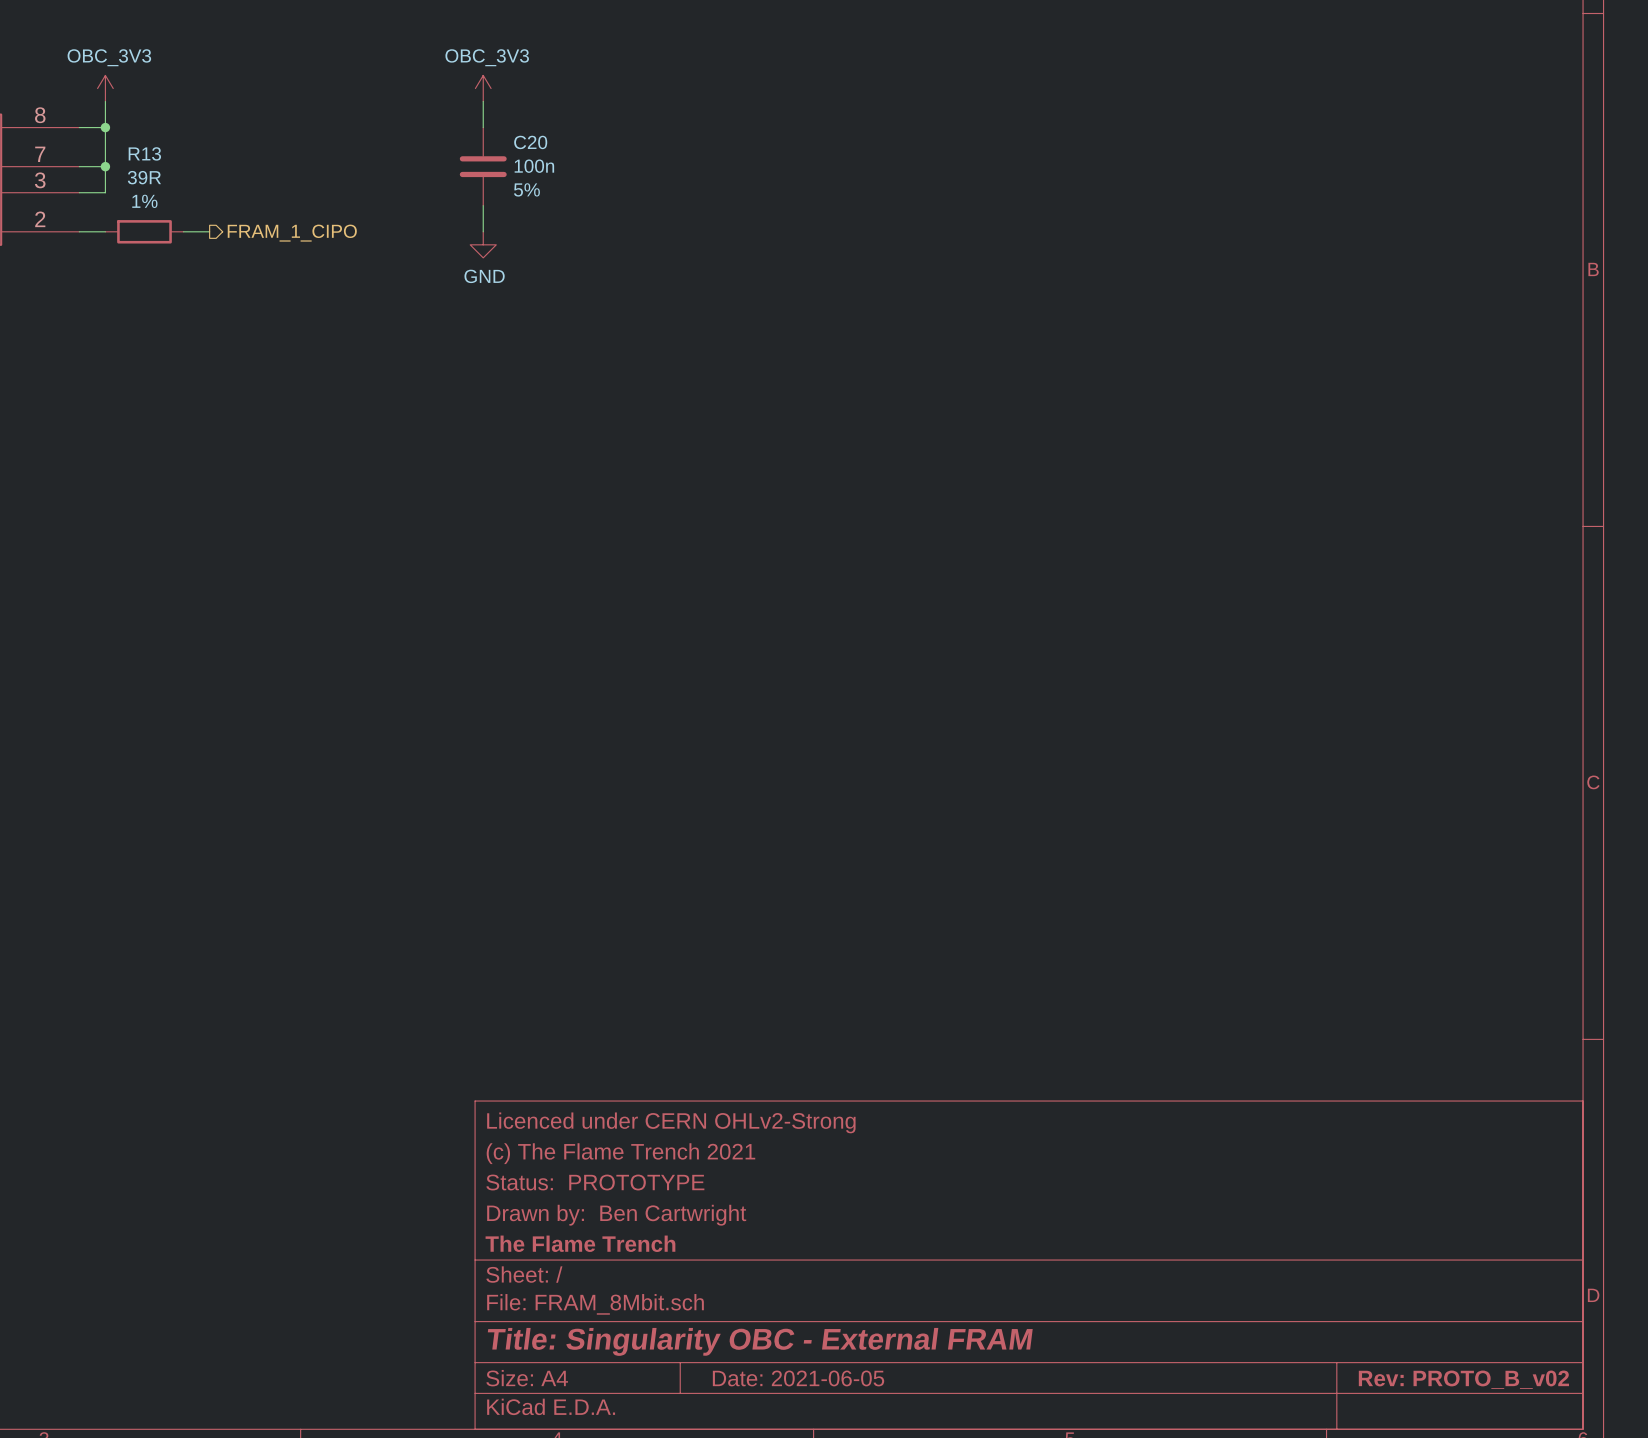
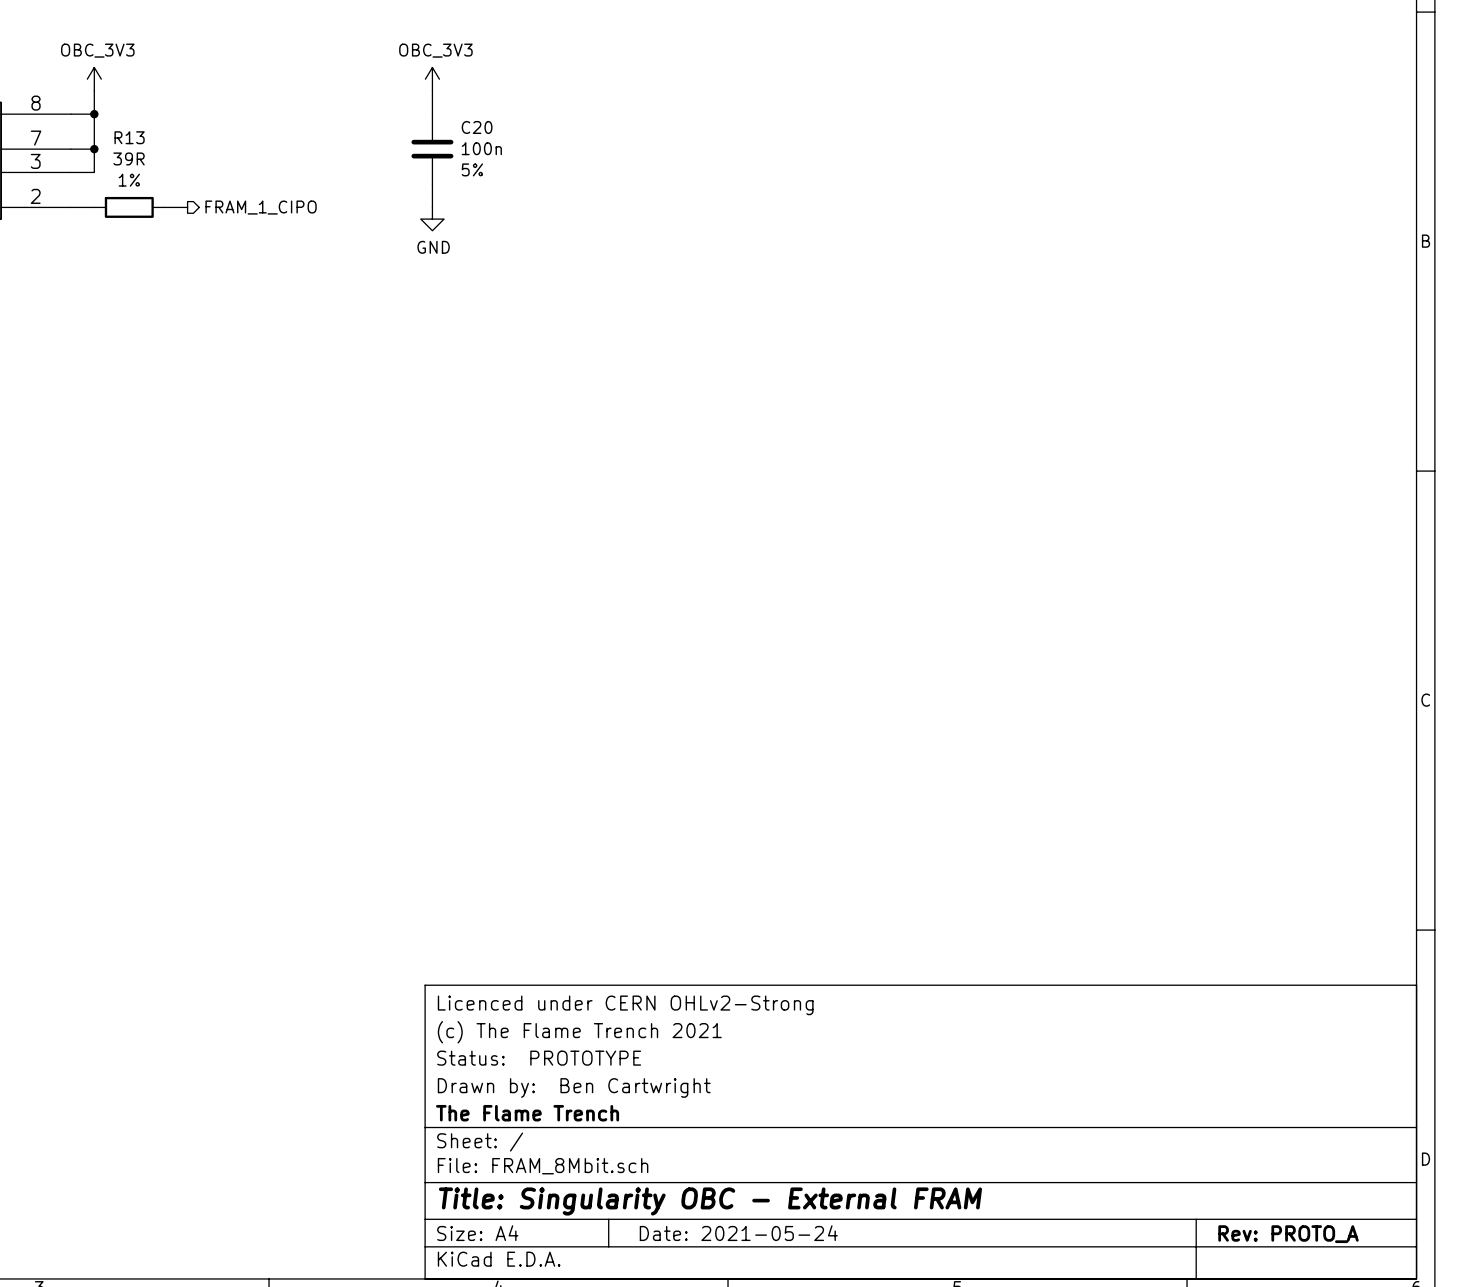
title block: Date: 2021-06-05 (798, 1378) -> Date: 2021-05-24 (738, 1233)
title block: Rev: PROTO_B_v02 (1463, 1379) -> Rev: PROTO_A (1288, 1234)

